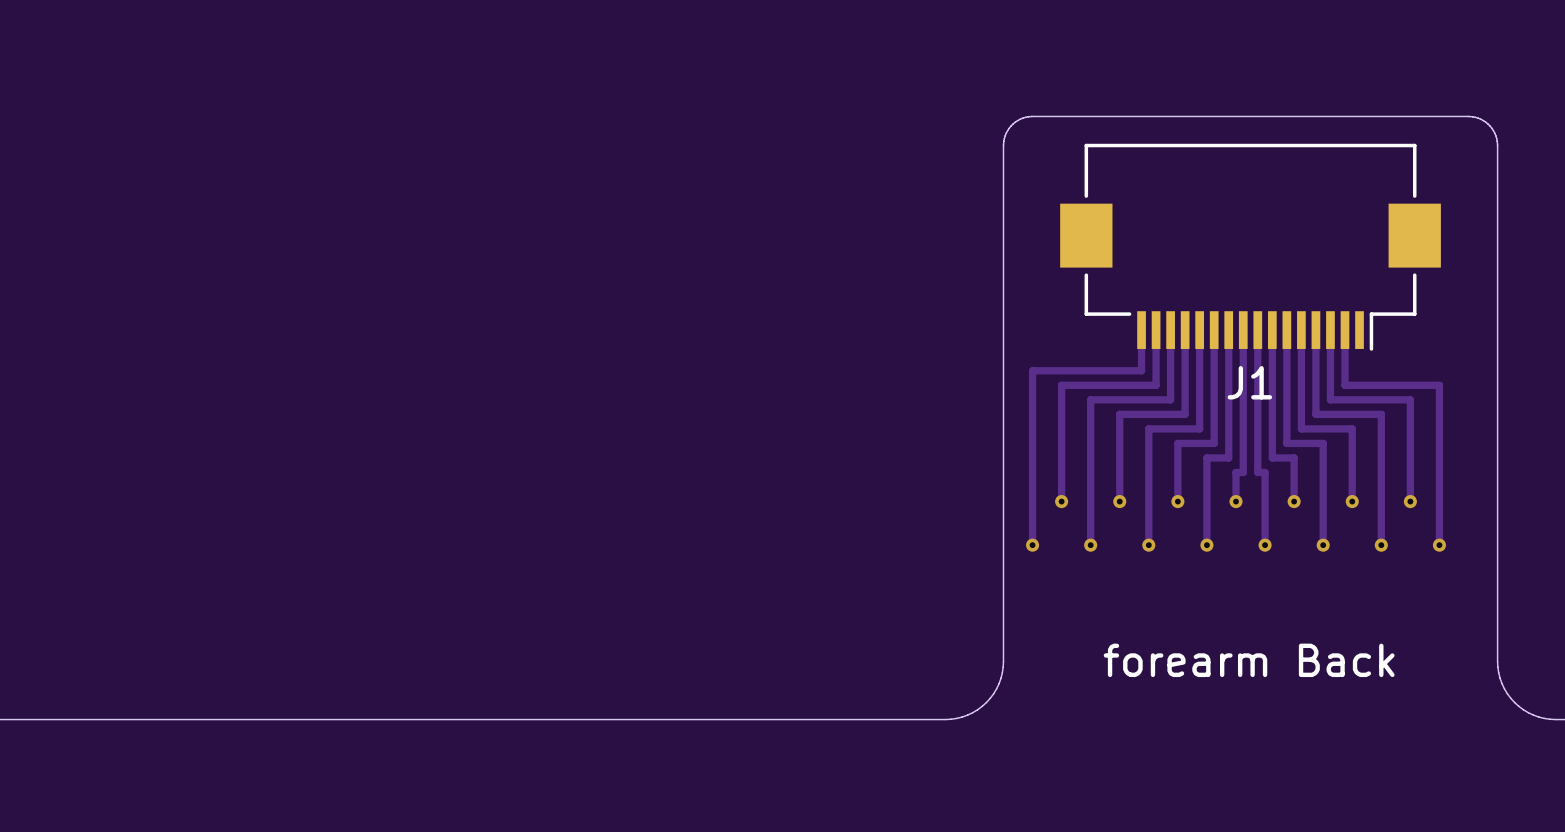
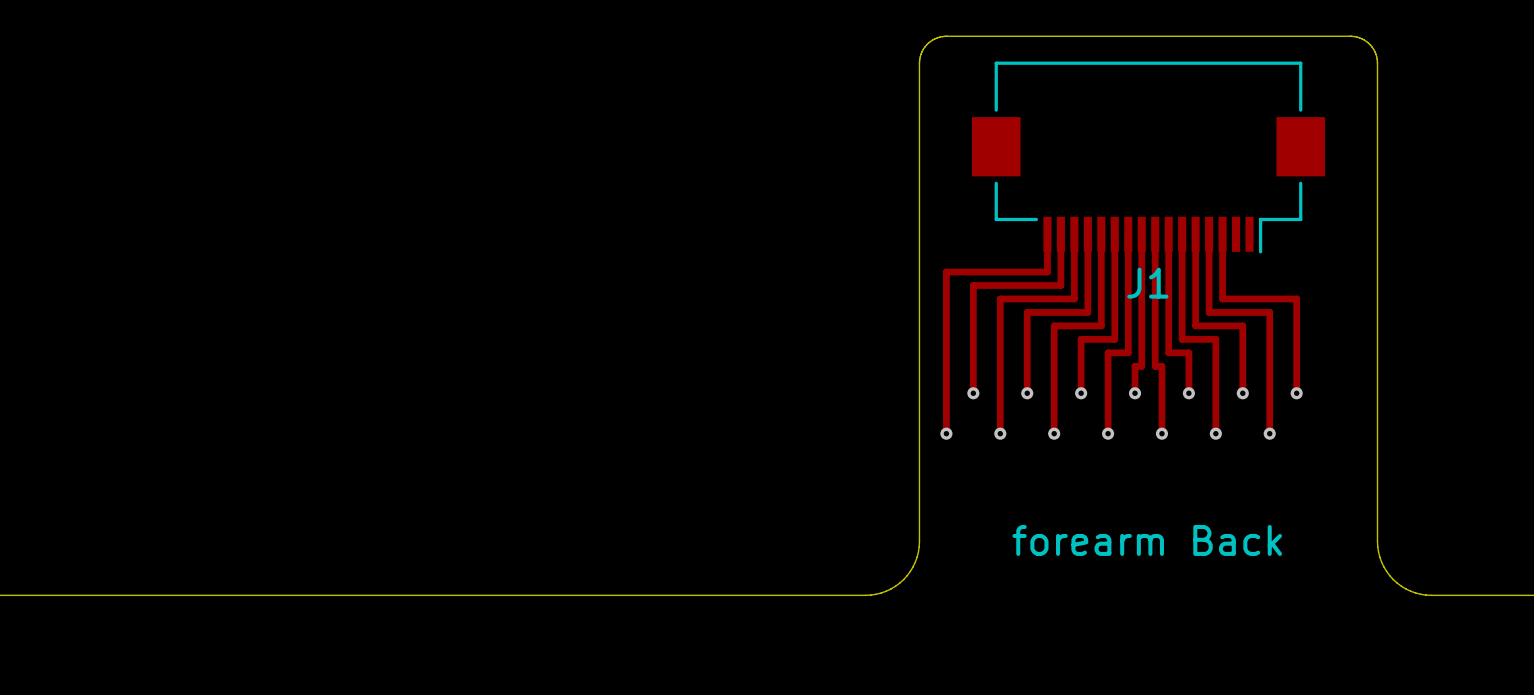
track: (1344, 330) (1344, 385) (1439, 385) (1439, 545) -> none
via: (1439, 545) -> none

